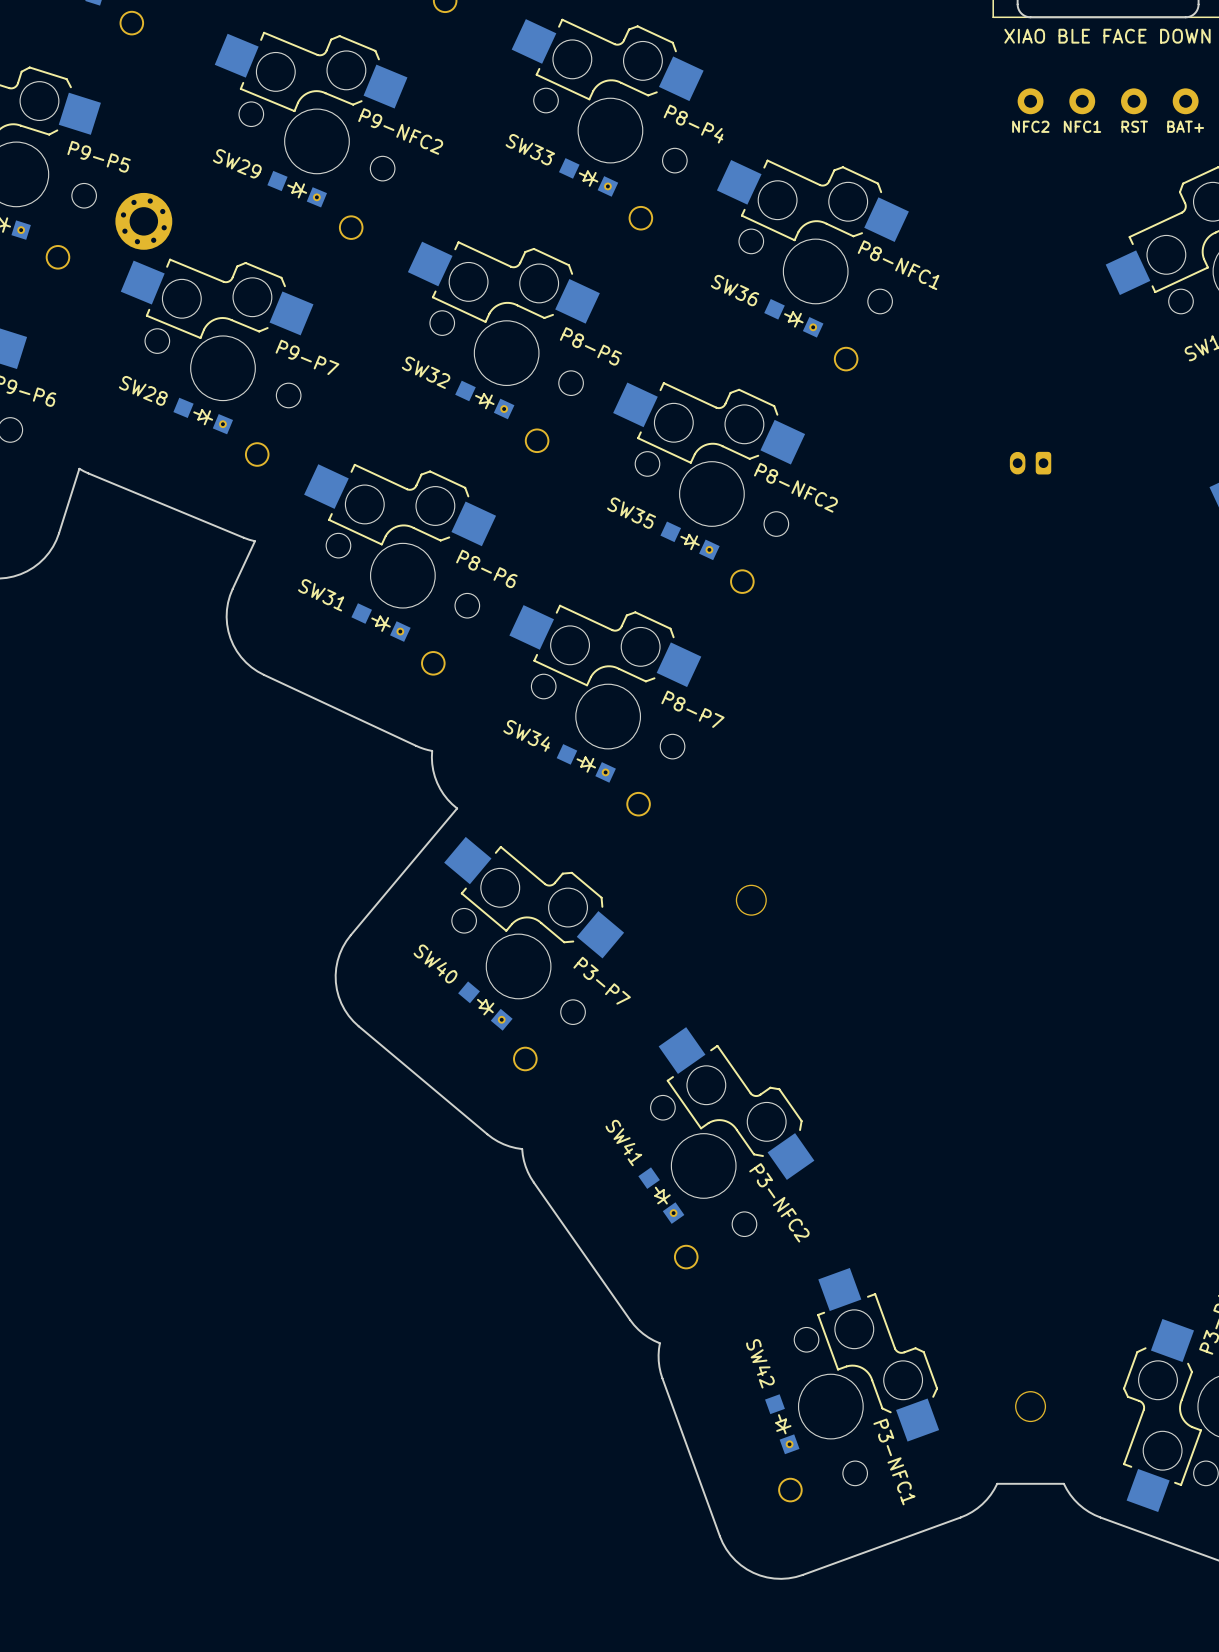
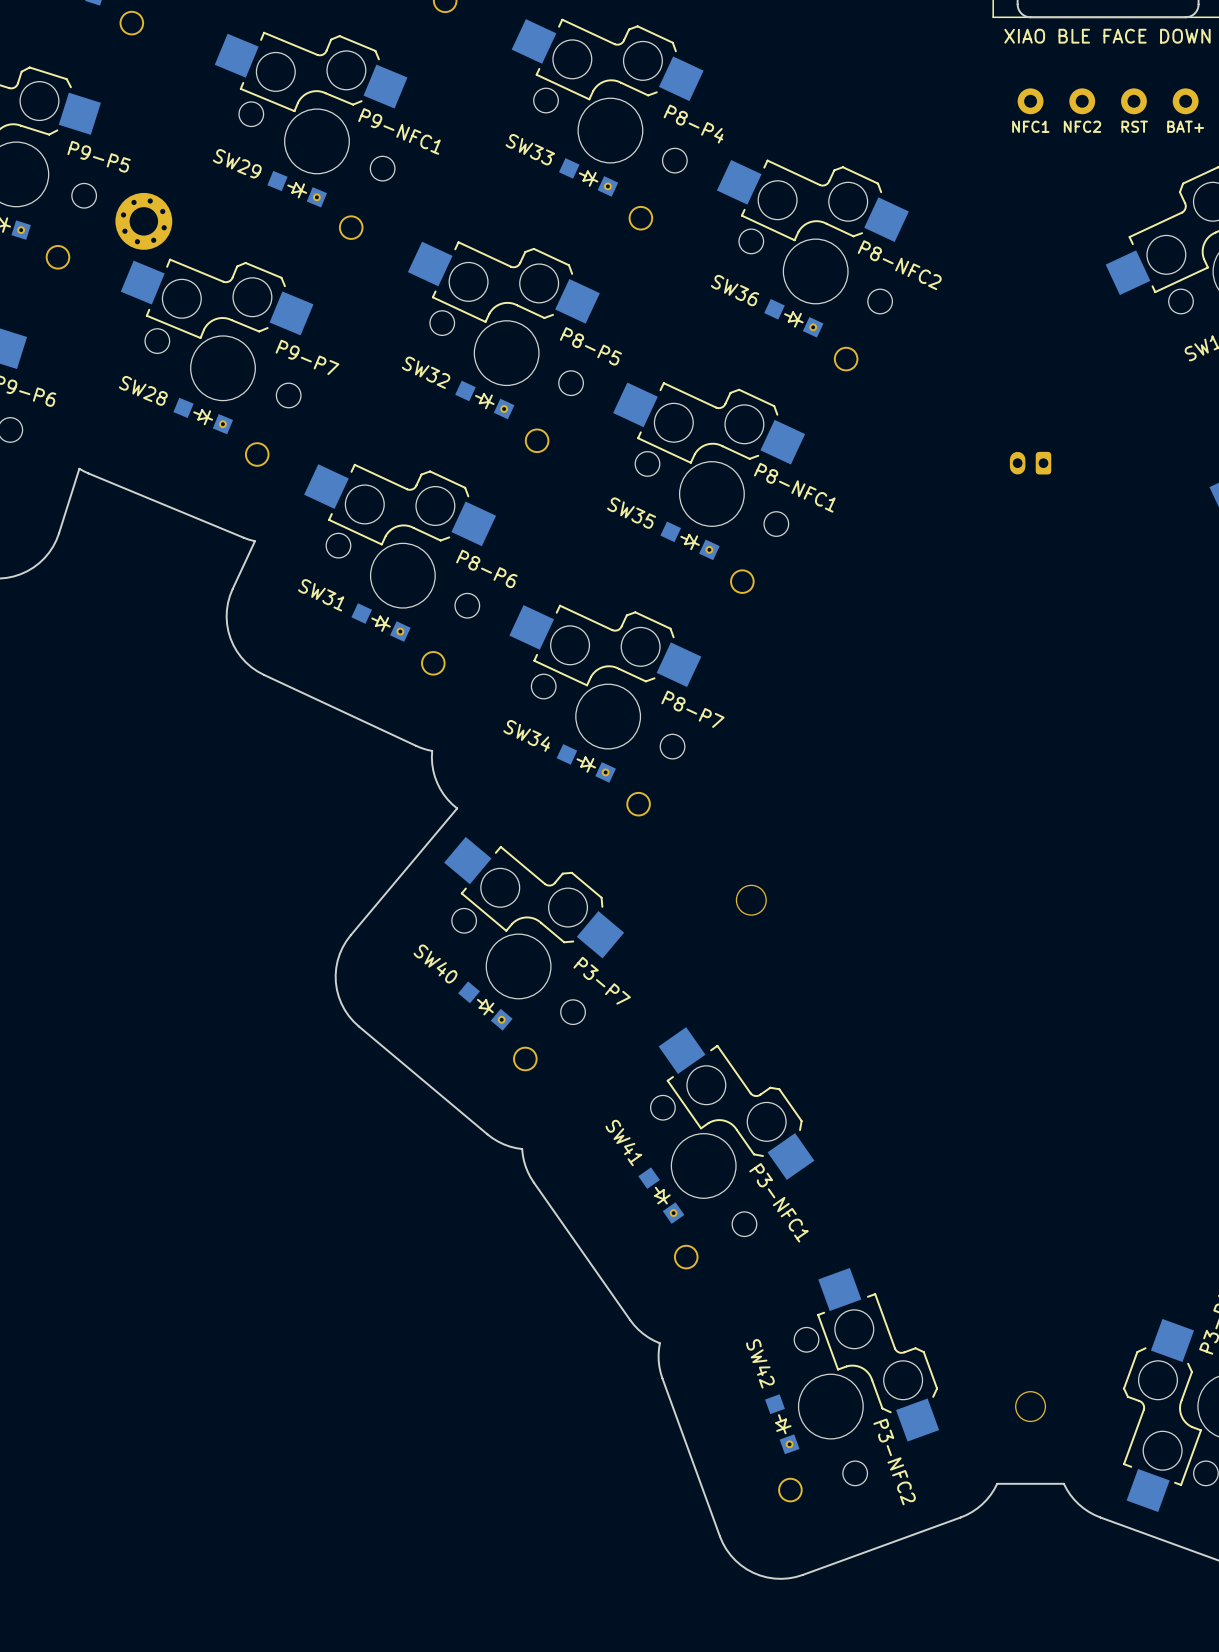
part text: NFC2 (1030, 126) -> NFC1 (1030, 126)
part text: NFC1 (1082, 126) -> NFC2 (1082, 126)
text: P9-NFC2 (400, 131) -> P9-NFC1 (399, 131)
text: P8-NFC1 (898, 265) -> P8-NFC2 (899, 265)
text: P8-NFC2 (795, 487) -> P8-NFC1 (794, 487)
text: P3-NFC2 (779, 1202) -> P3-NFC1 (778, 1202)
text: P3-NFC1 (894, 1461) -> P3-NFC2 (894, 1461)

